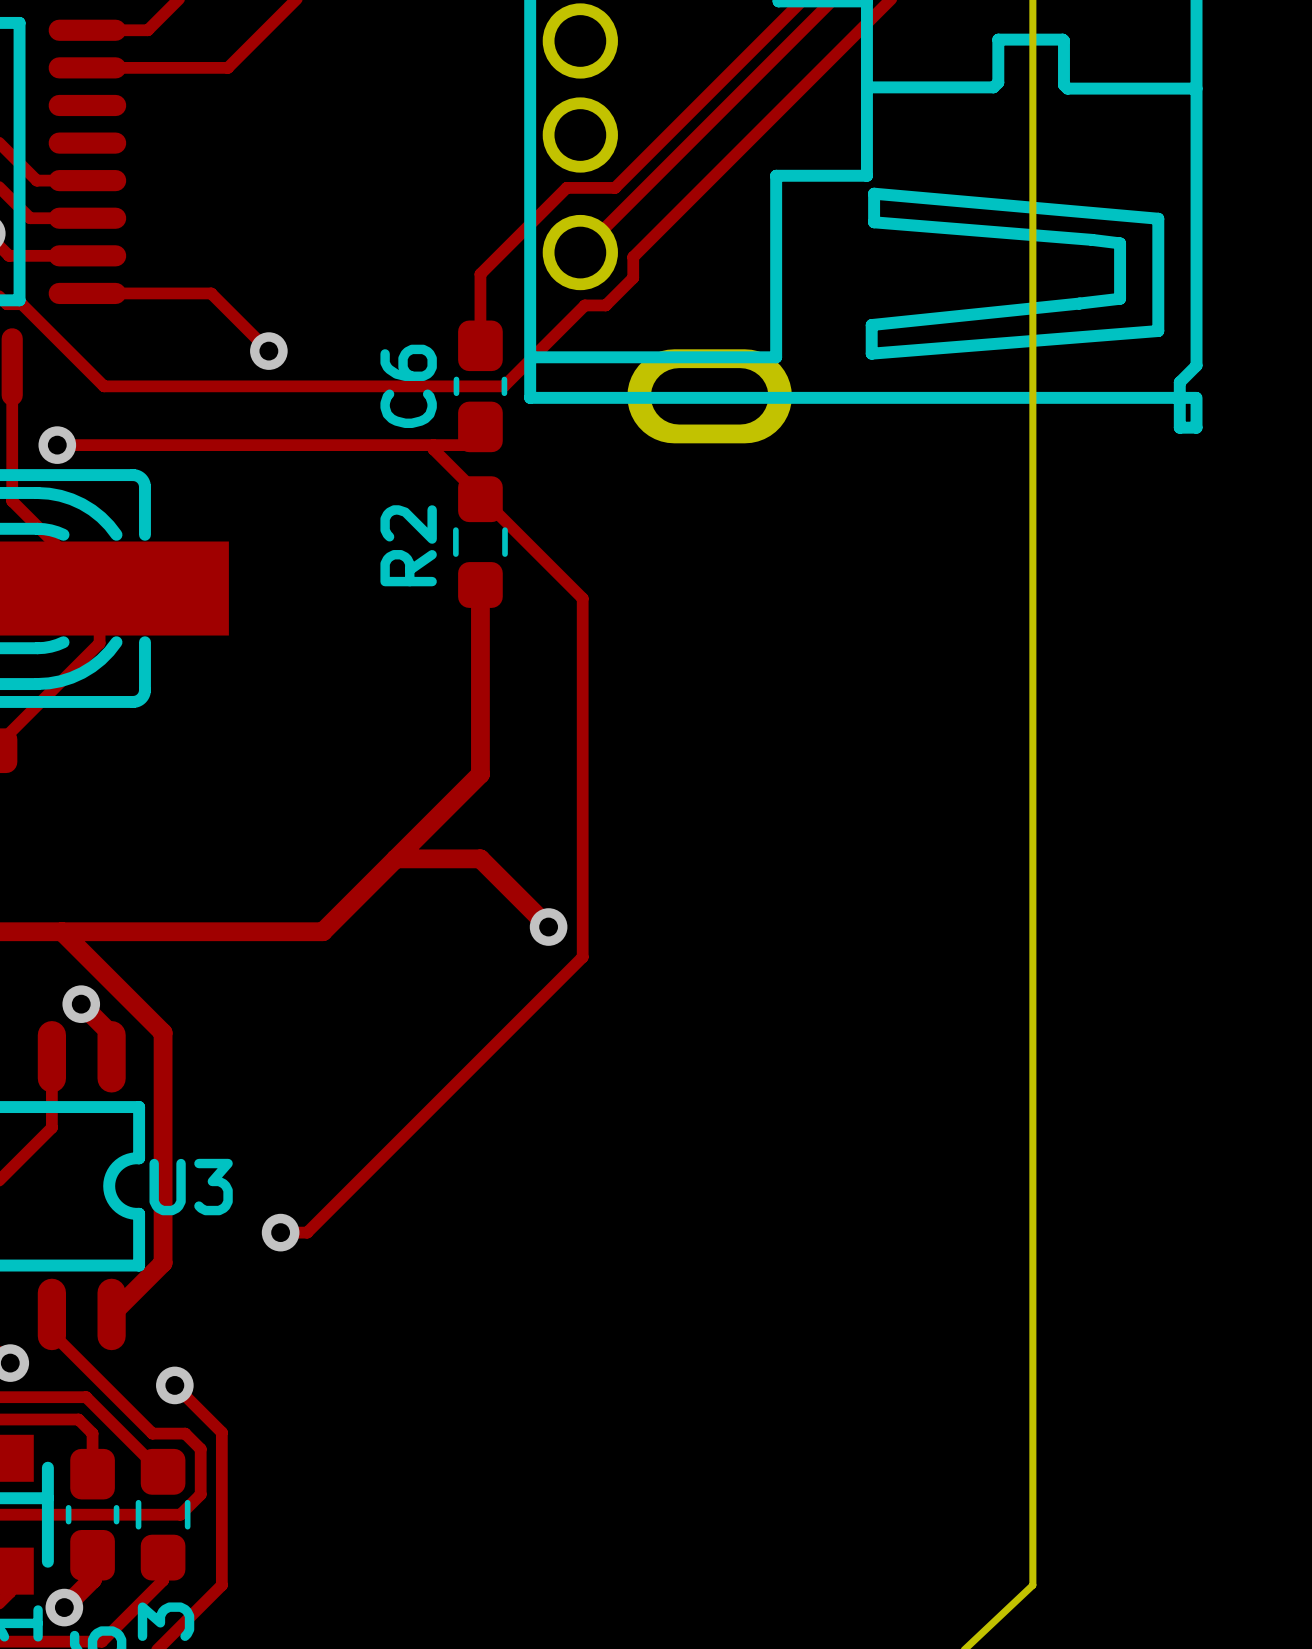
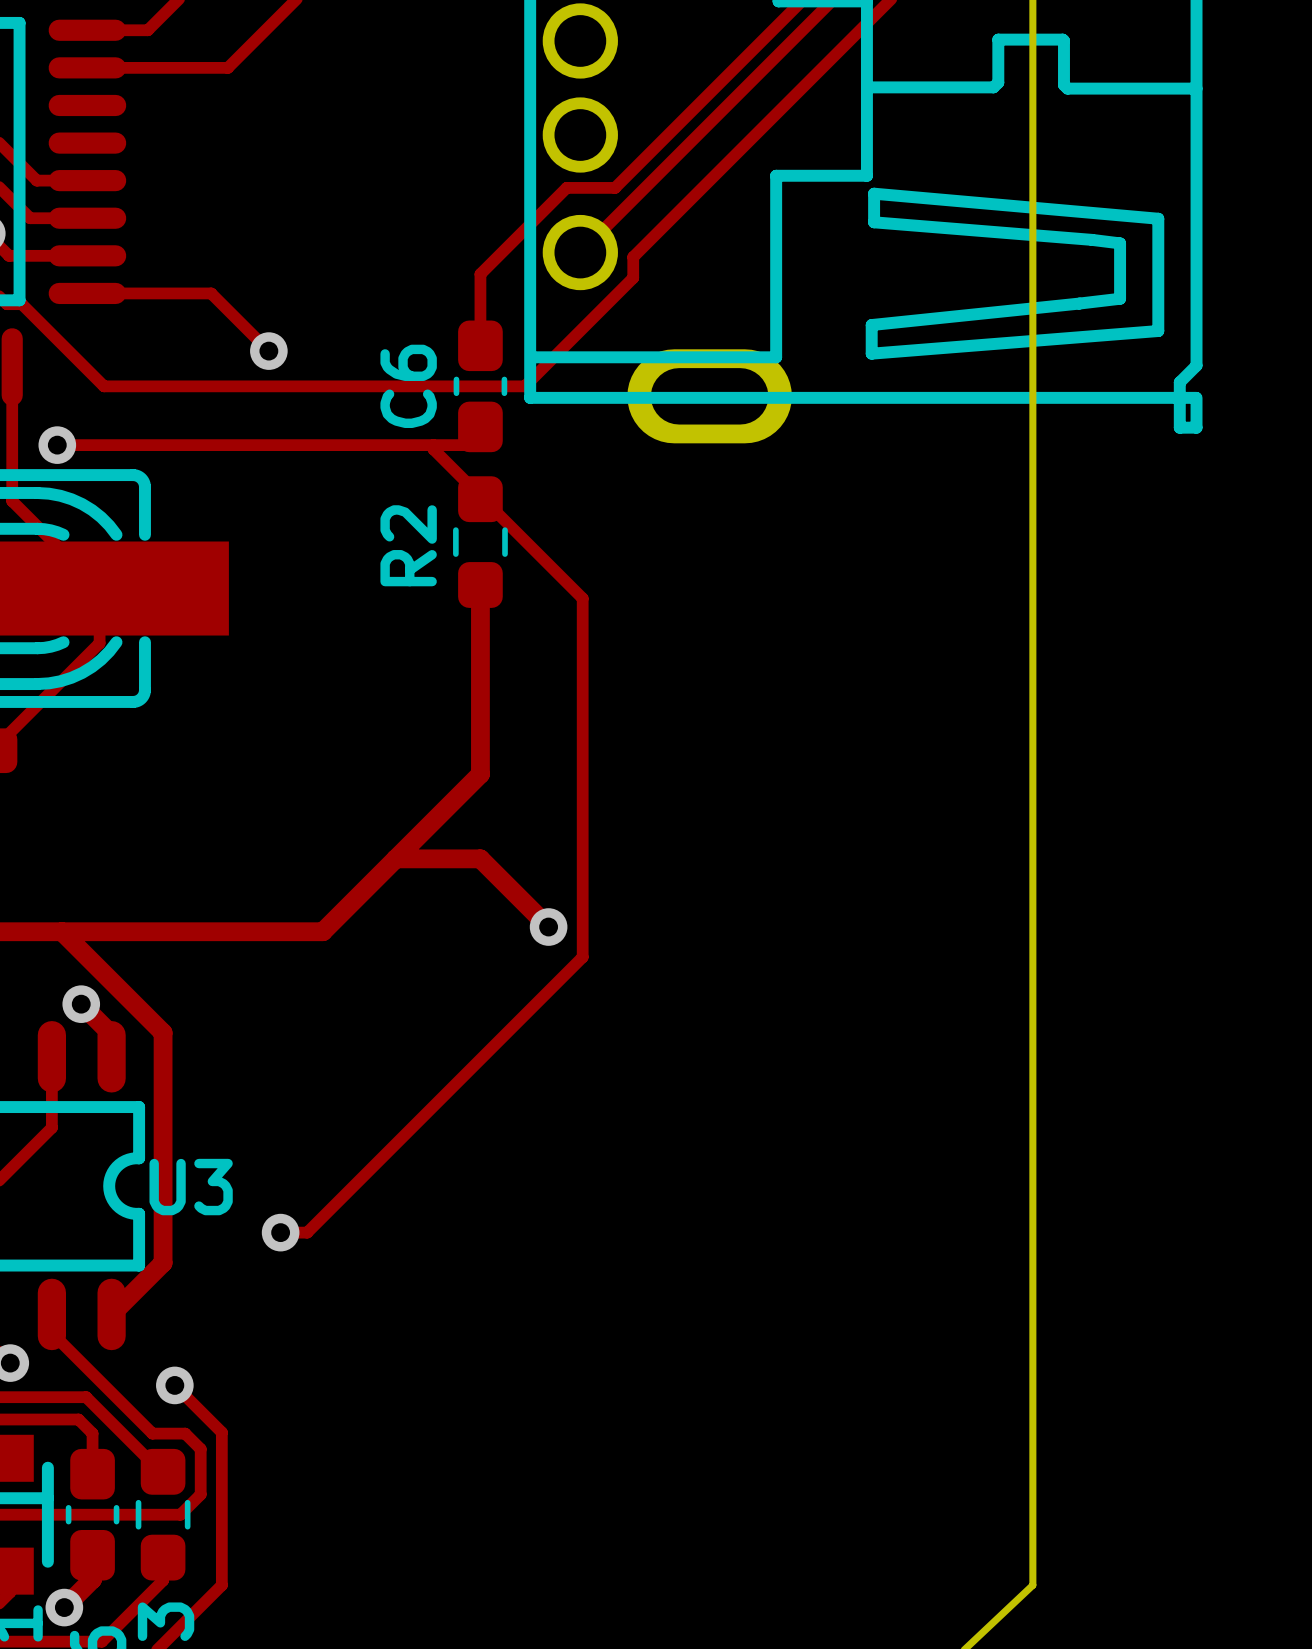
track: (605, 305) (584, 305) (503, 386) -> (605, 305) (524, 386) (503, 386)

